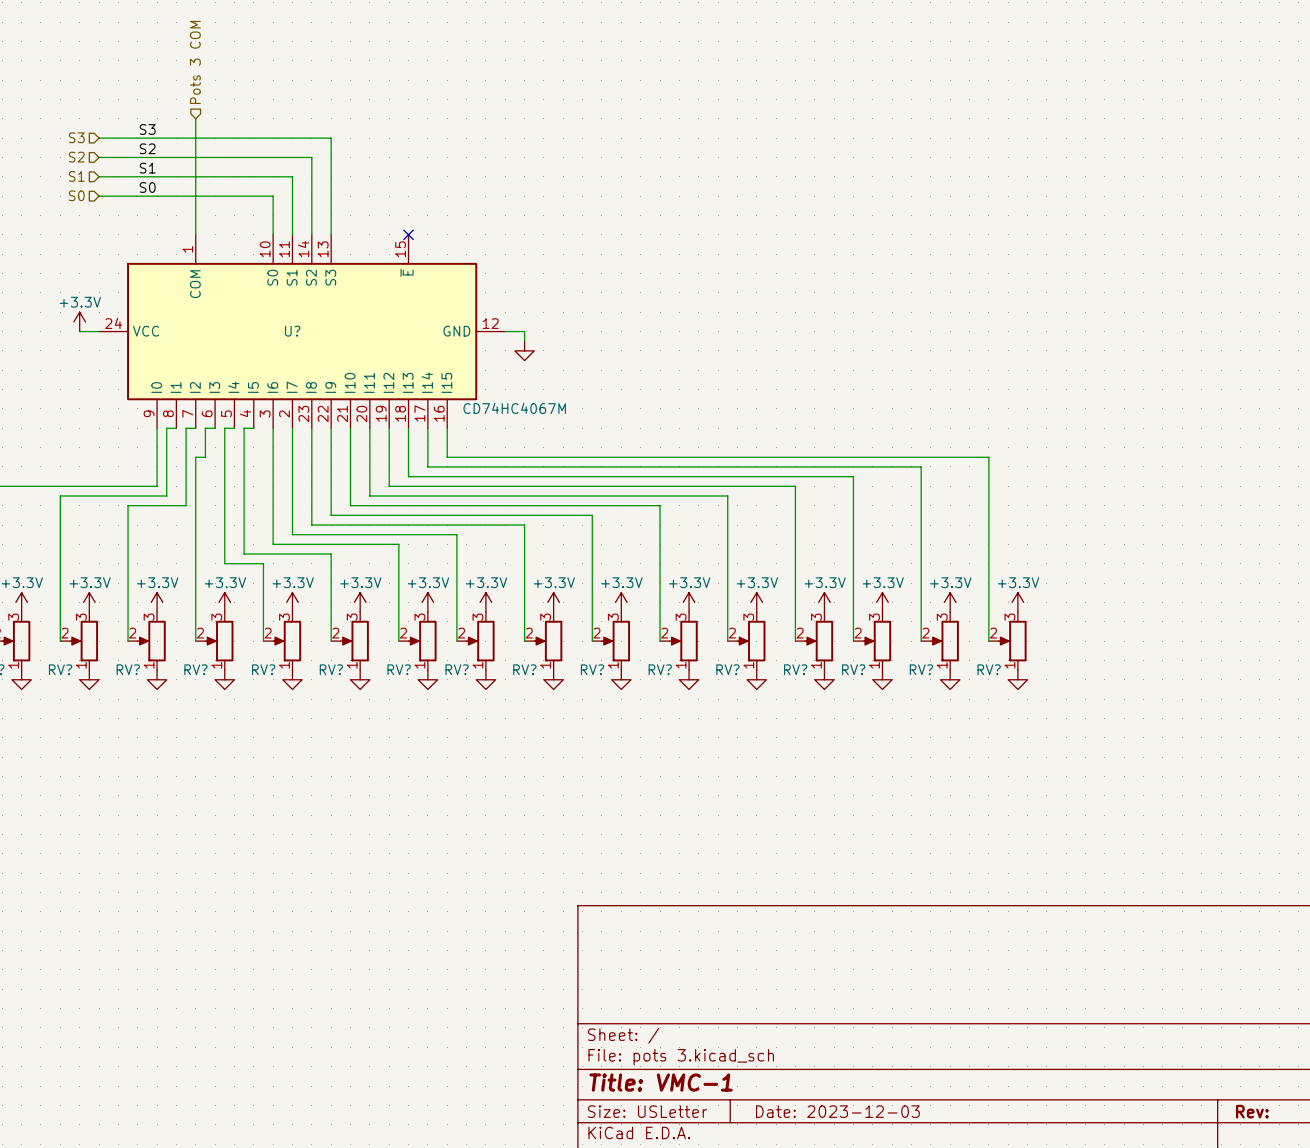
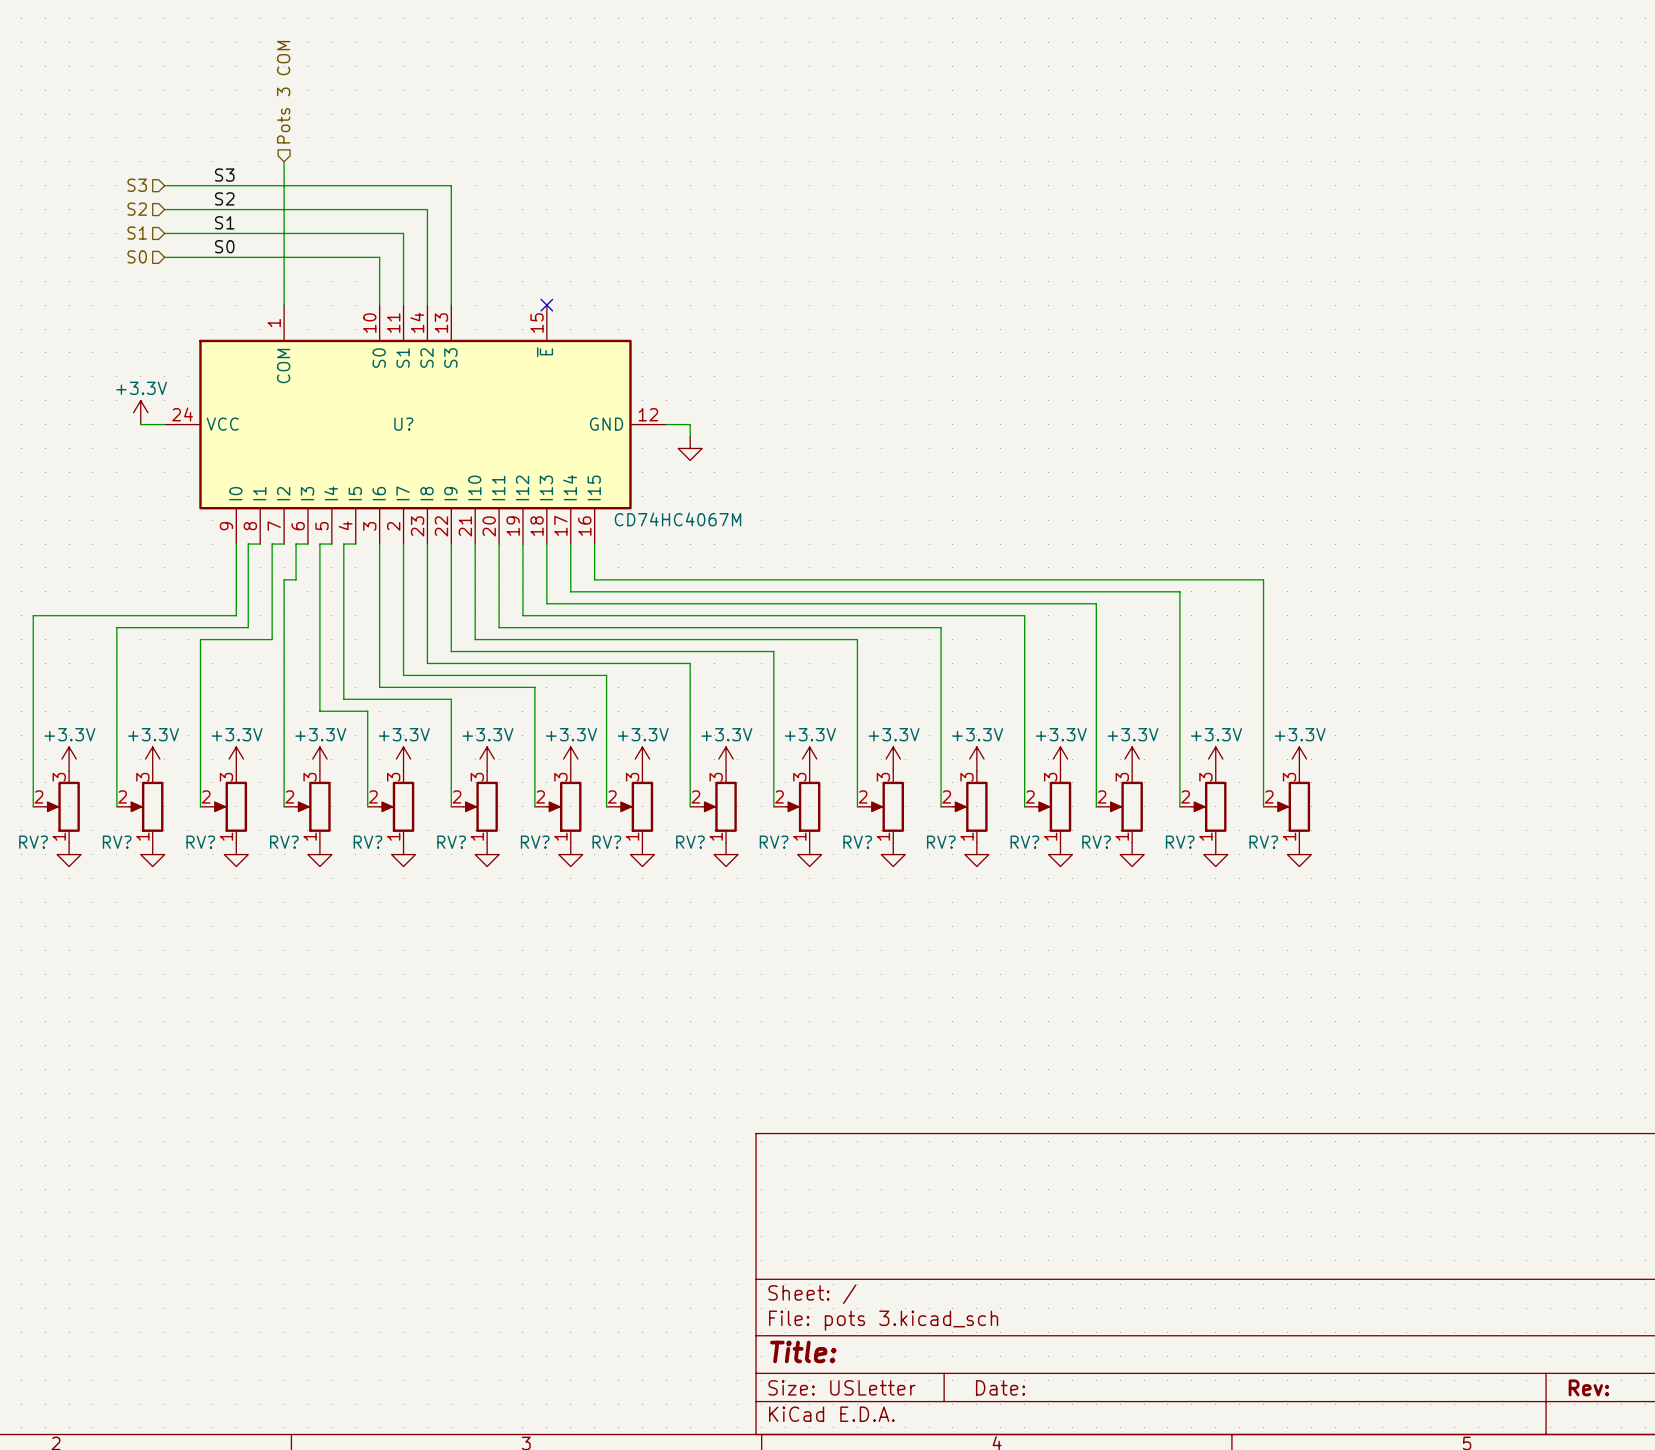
title block: Title: VMC-1 (661, 1082) -> Title: (803, 1351)
title block: Date: 2023-12-03 (837, 1111) -> Date: (1000, 1387)

